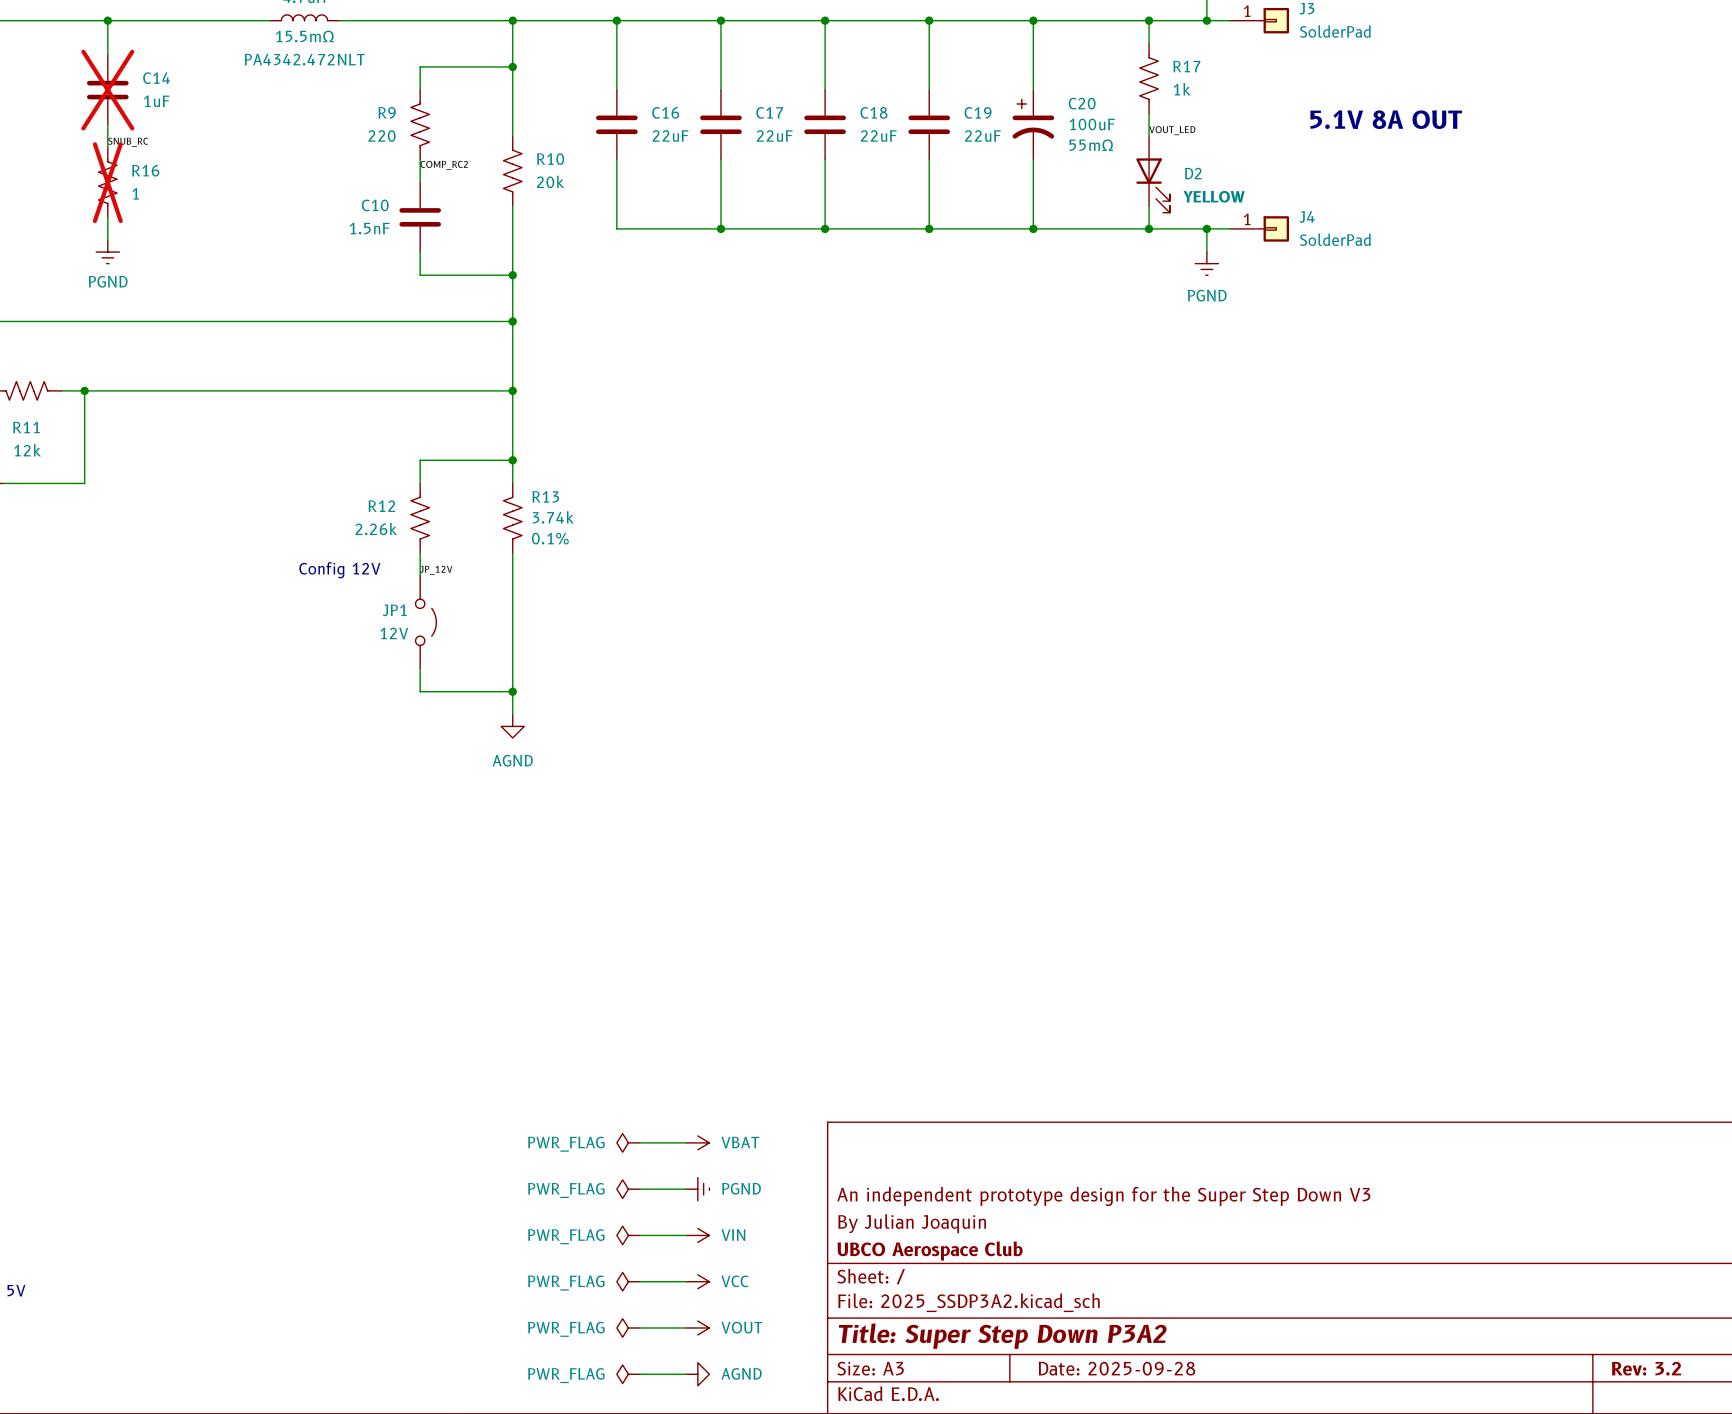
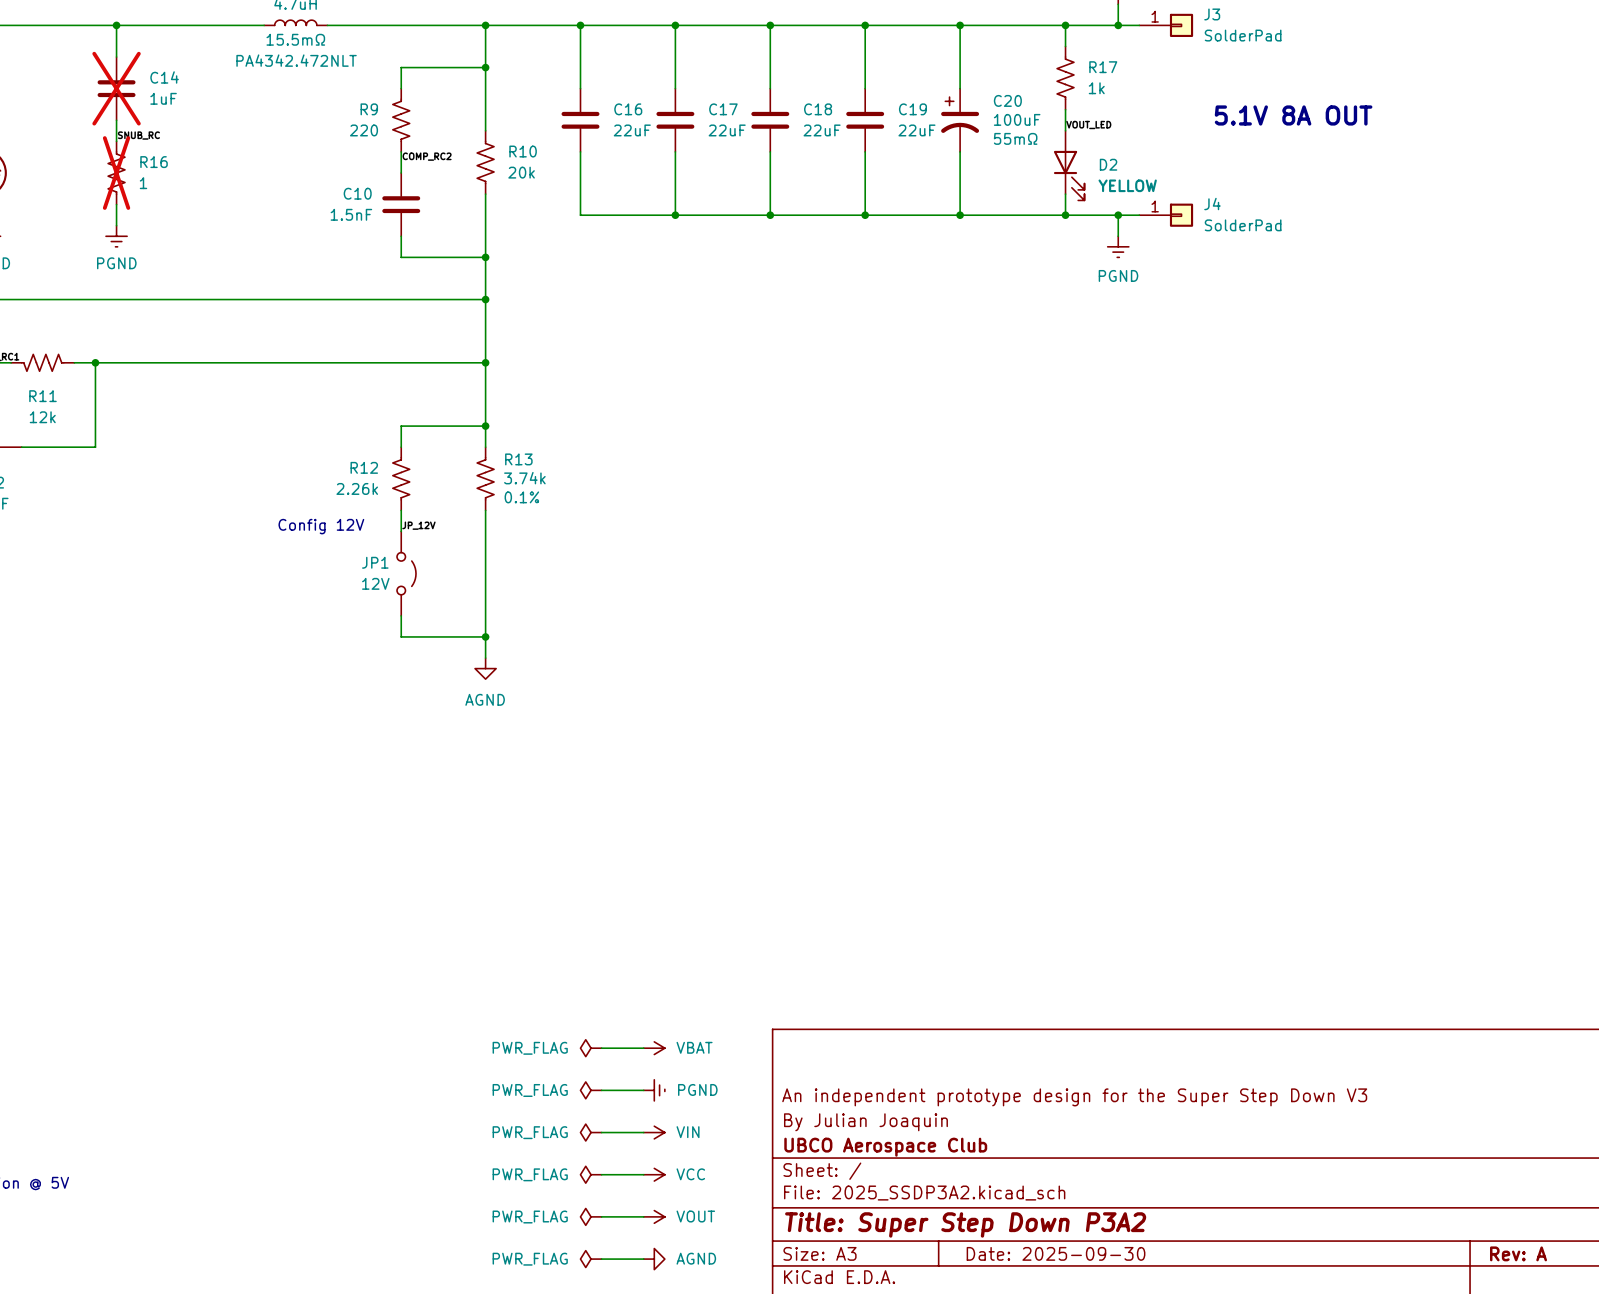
title block: Date: 2025-09-28 (1116, 1368) -> Date: 2025-09-30 (1056, 1253)
title block: Rev: 3.2 (1646, 1368) -> Rev: A (1518, 1253)

